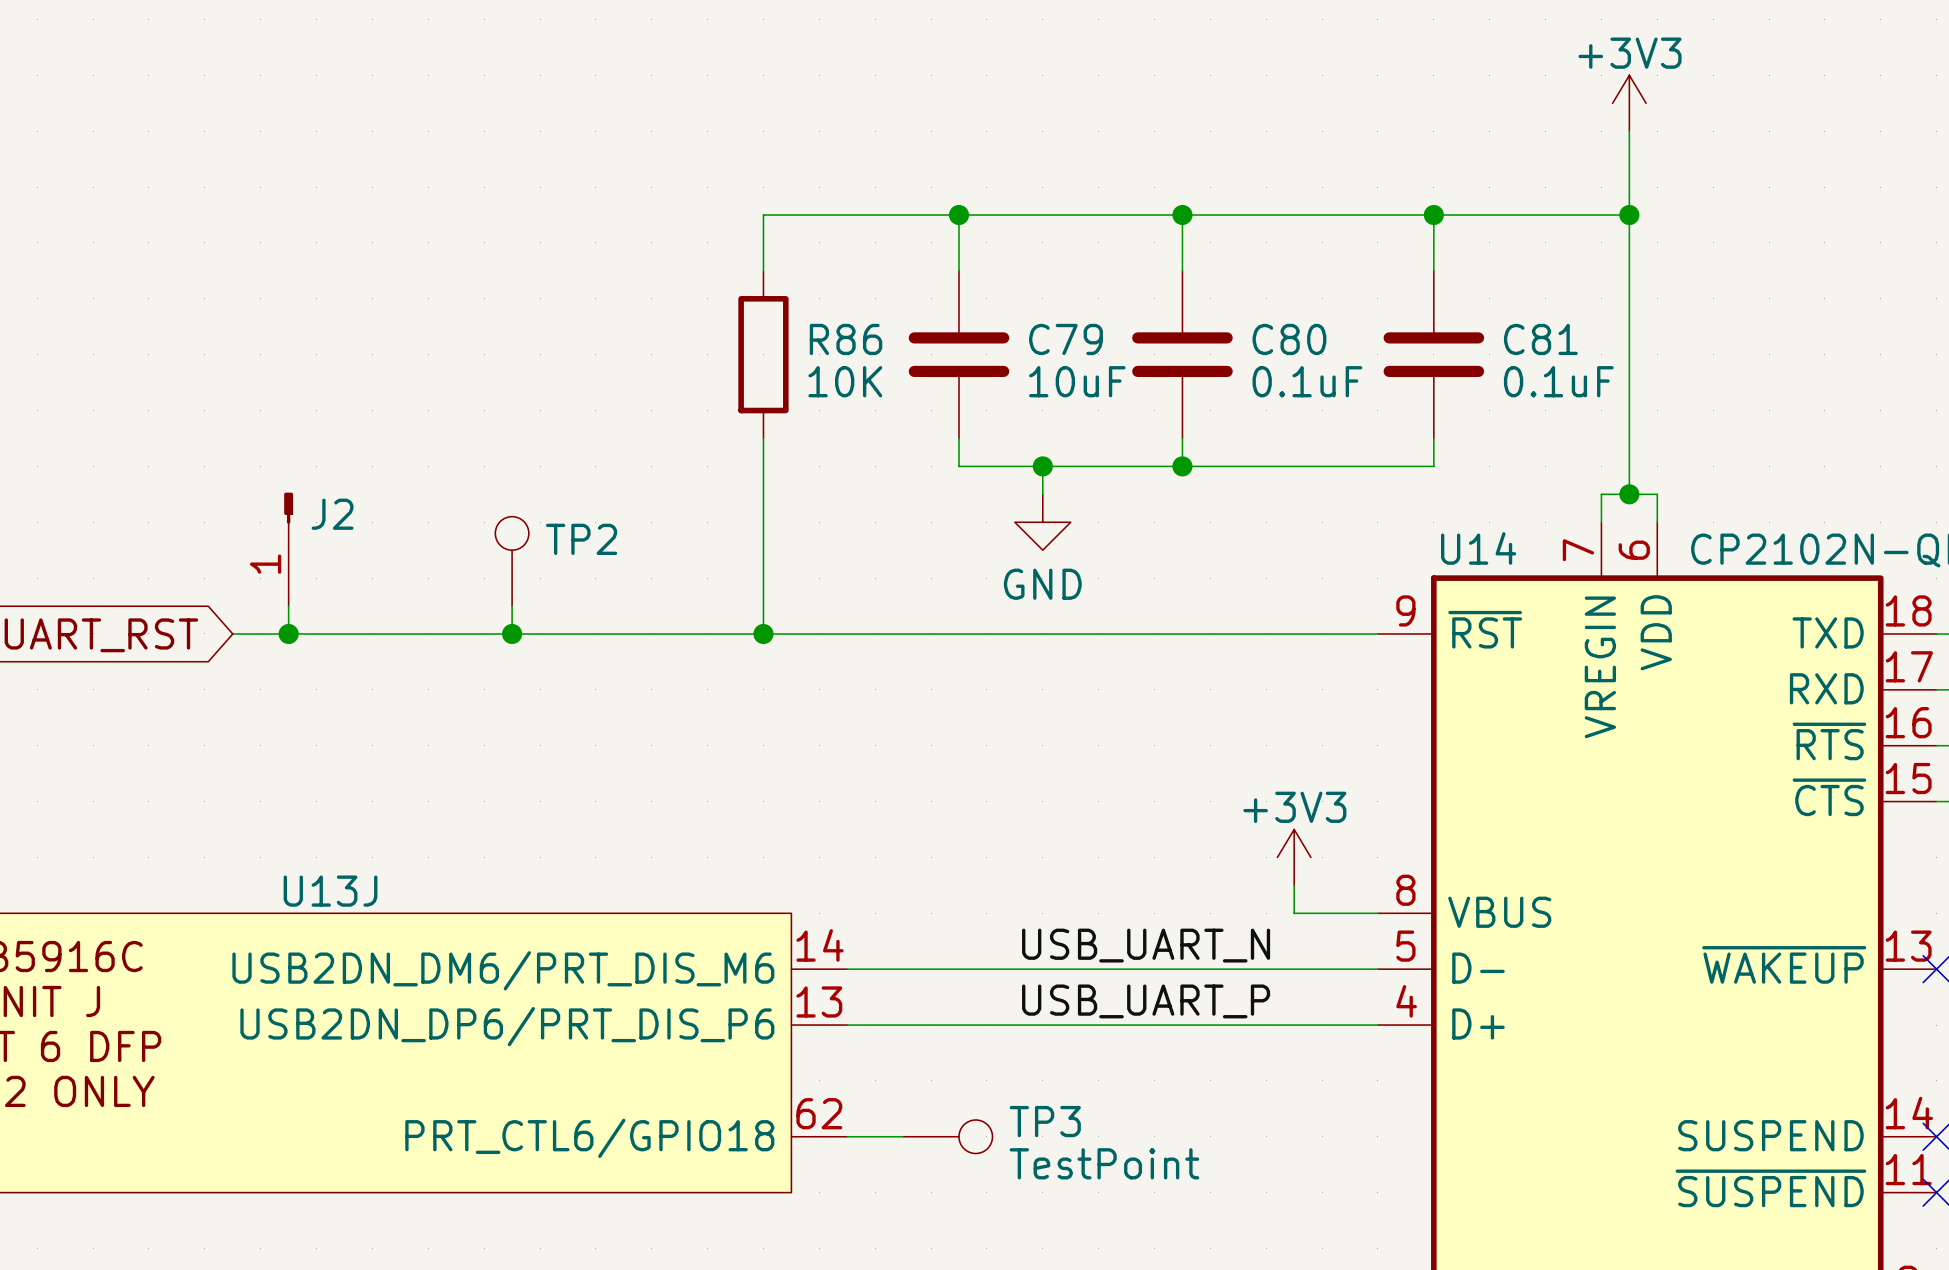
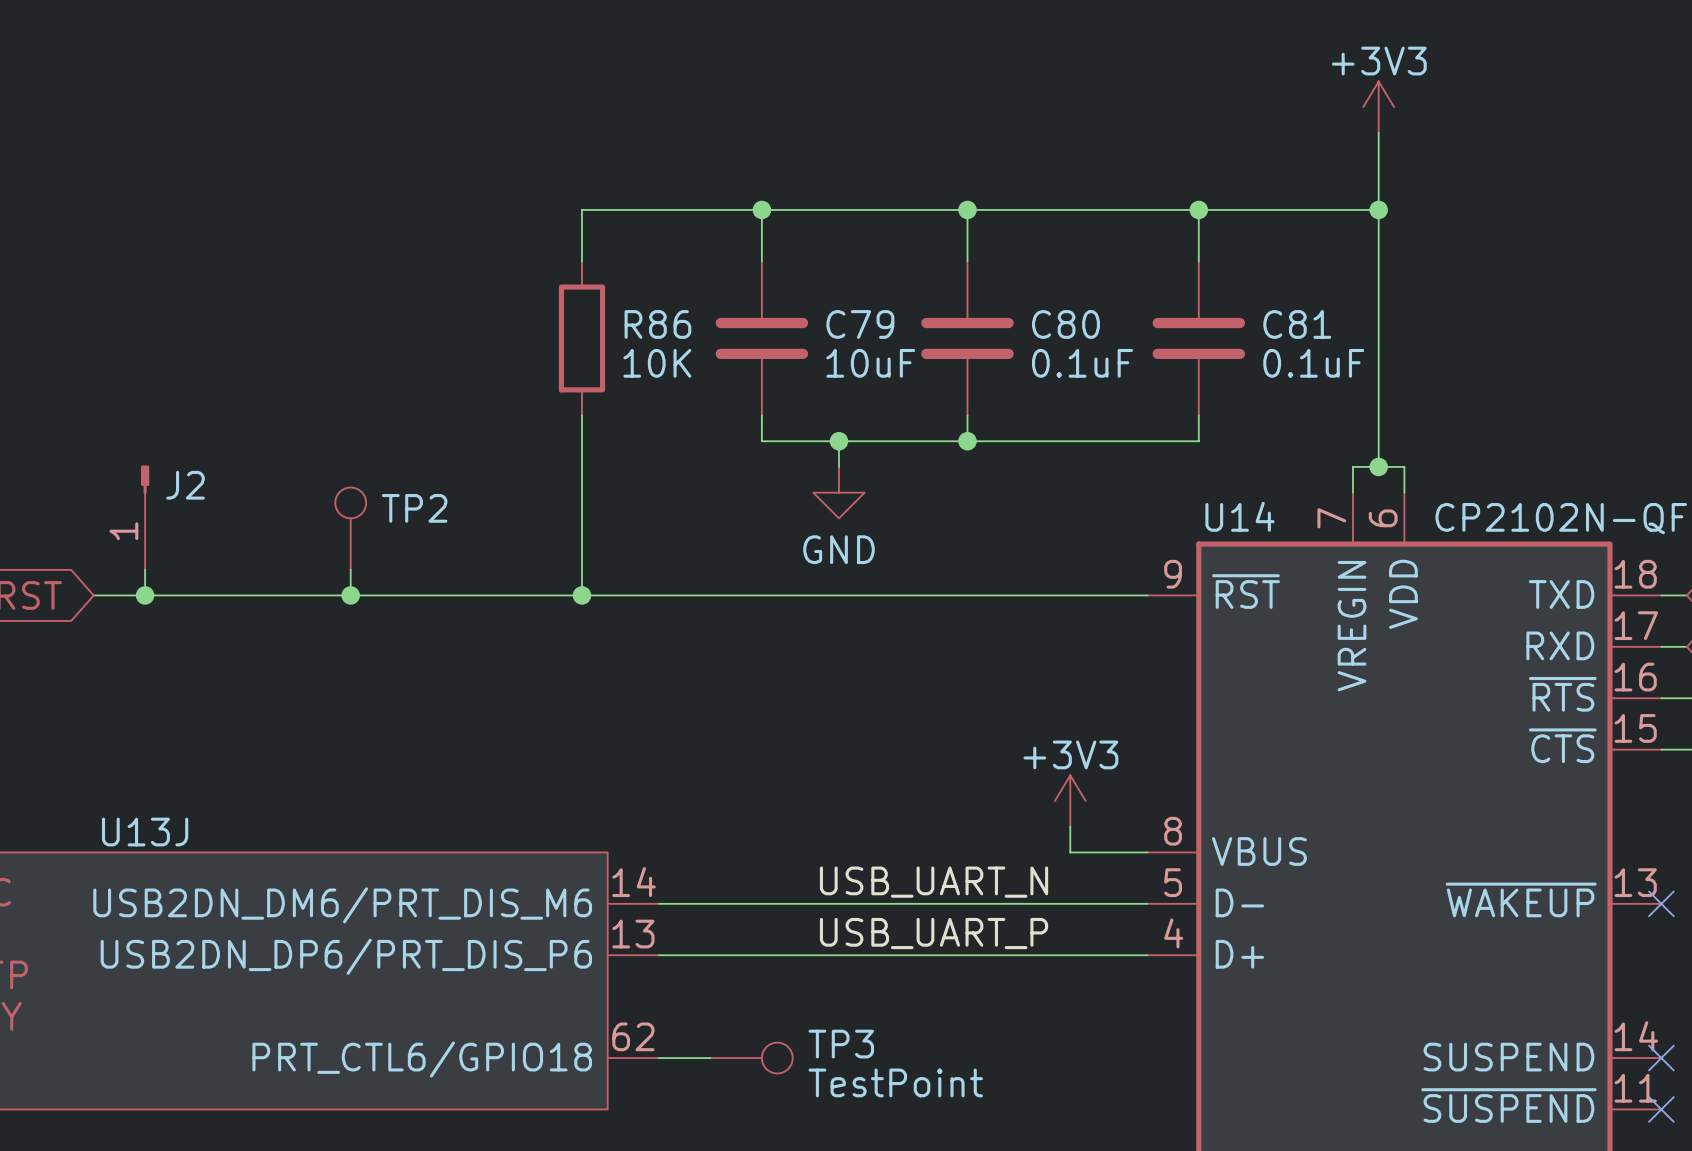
U13J name position: U13J (330, 891) -> U13J (145, 832)

